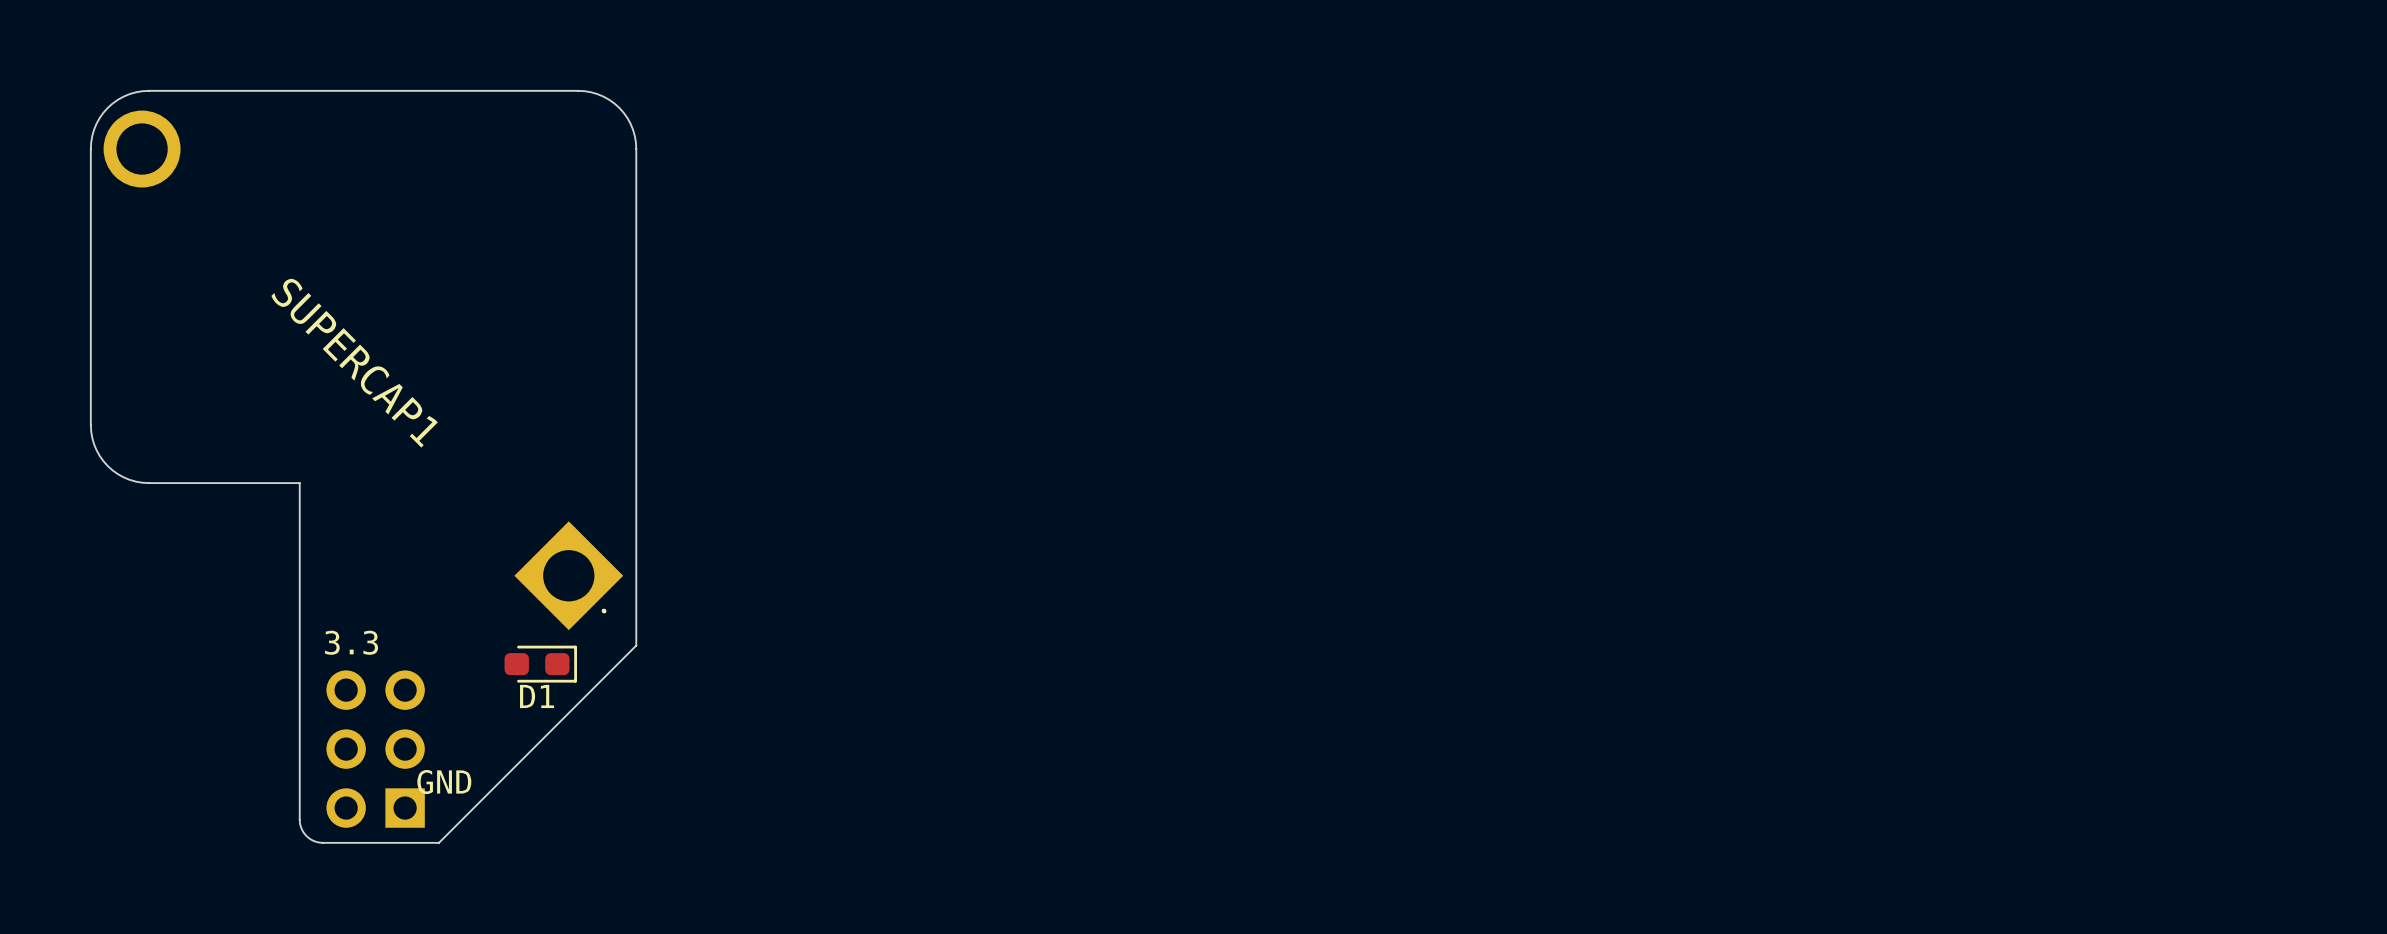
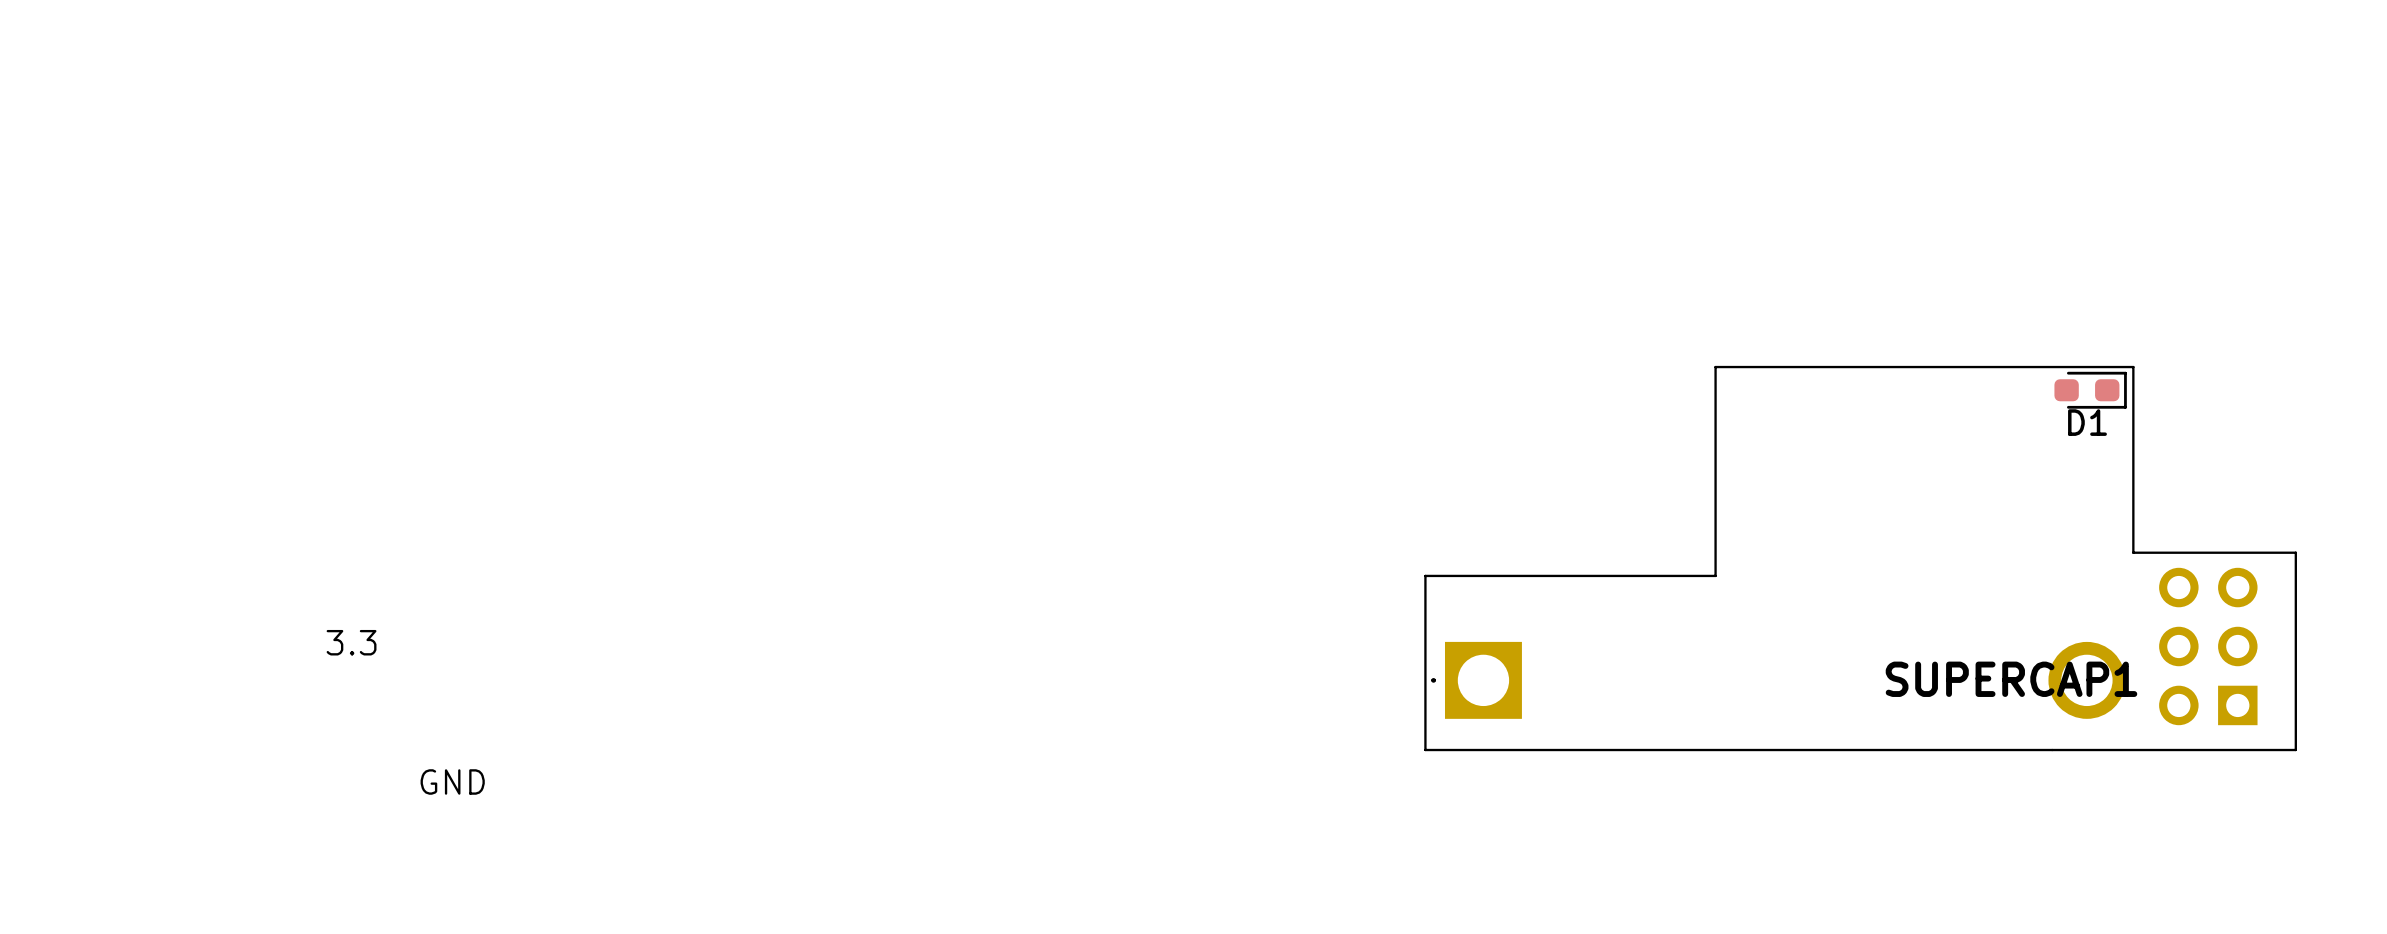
board edge: (148, 90) (584, 91) (603, 96) (614, 103) (627, 117) (633, 129) (636, 148) (636, 645) (438, 842) (320, 842) (308, 837) (301, 827) (299, 483) (135, 481) (123, 477) (107, 466) (94, 444) (90, 425) (91, 142) (96, 123) (107, 107) (123, 96) (148, 90) -> none
SUPERCAP1 name position: SUPERCAP1 (354, 363) -> SUPERCAP1 (2011, 679)
line: none -> (1715, 367) (1715, 575) (1425, 575) (1425, 750) (2295, 750) (2295, 552) (2133, 552) (2133, 367) (1715, 367)
SUPERCAP1 rotation: 0° (363, 370) -> 135° clockwise (1778, 680)
SUPERCAP1 position: (363, 370) -> (1778, 680)
part: none -> (2208, 646)
D1 position: (540, 664) -> (2090, 390)
part: (375, 749) -> none

